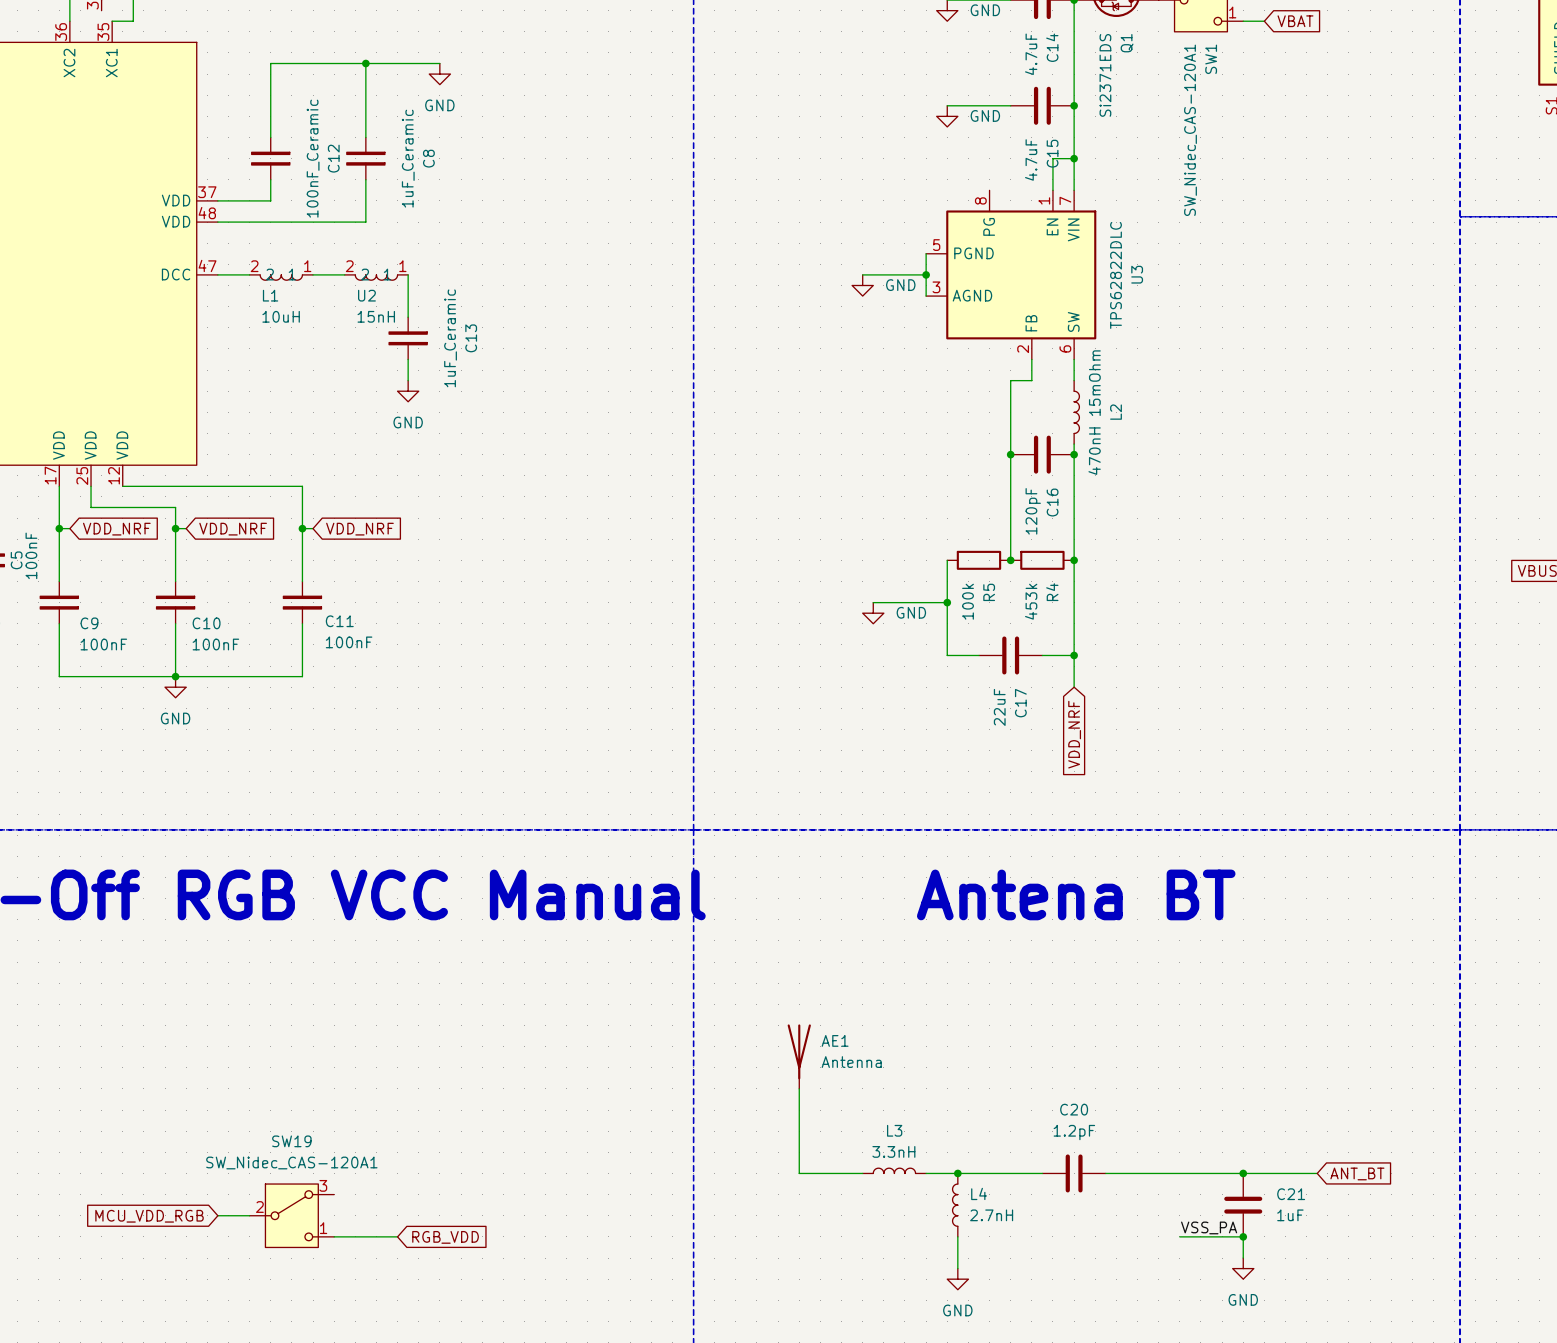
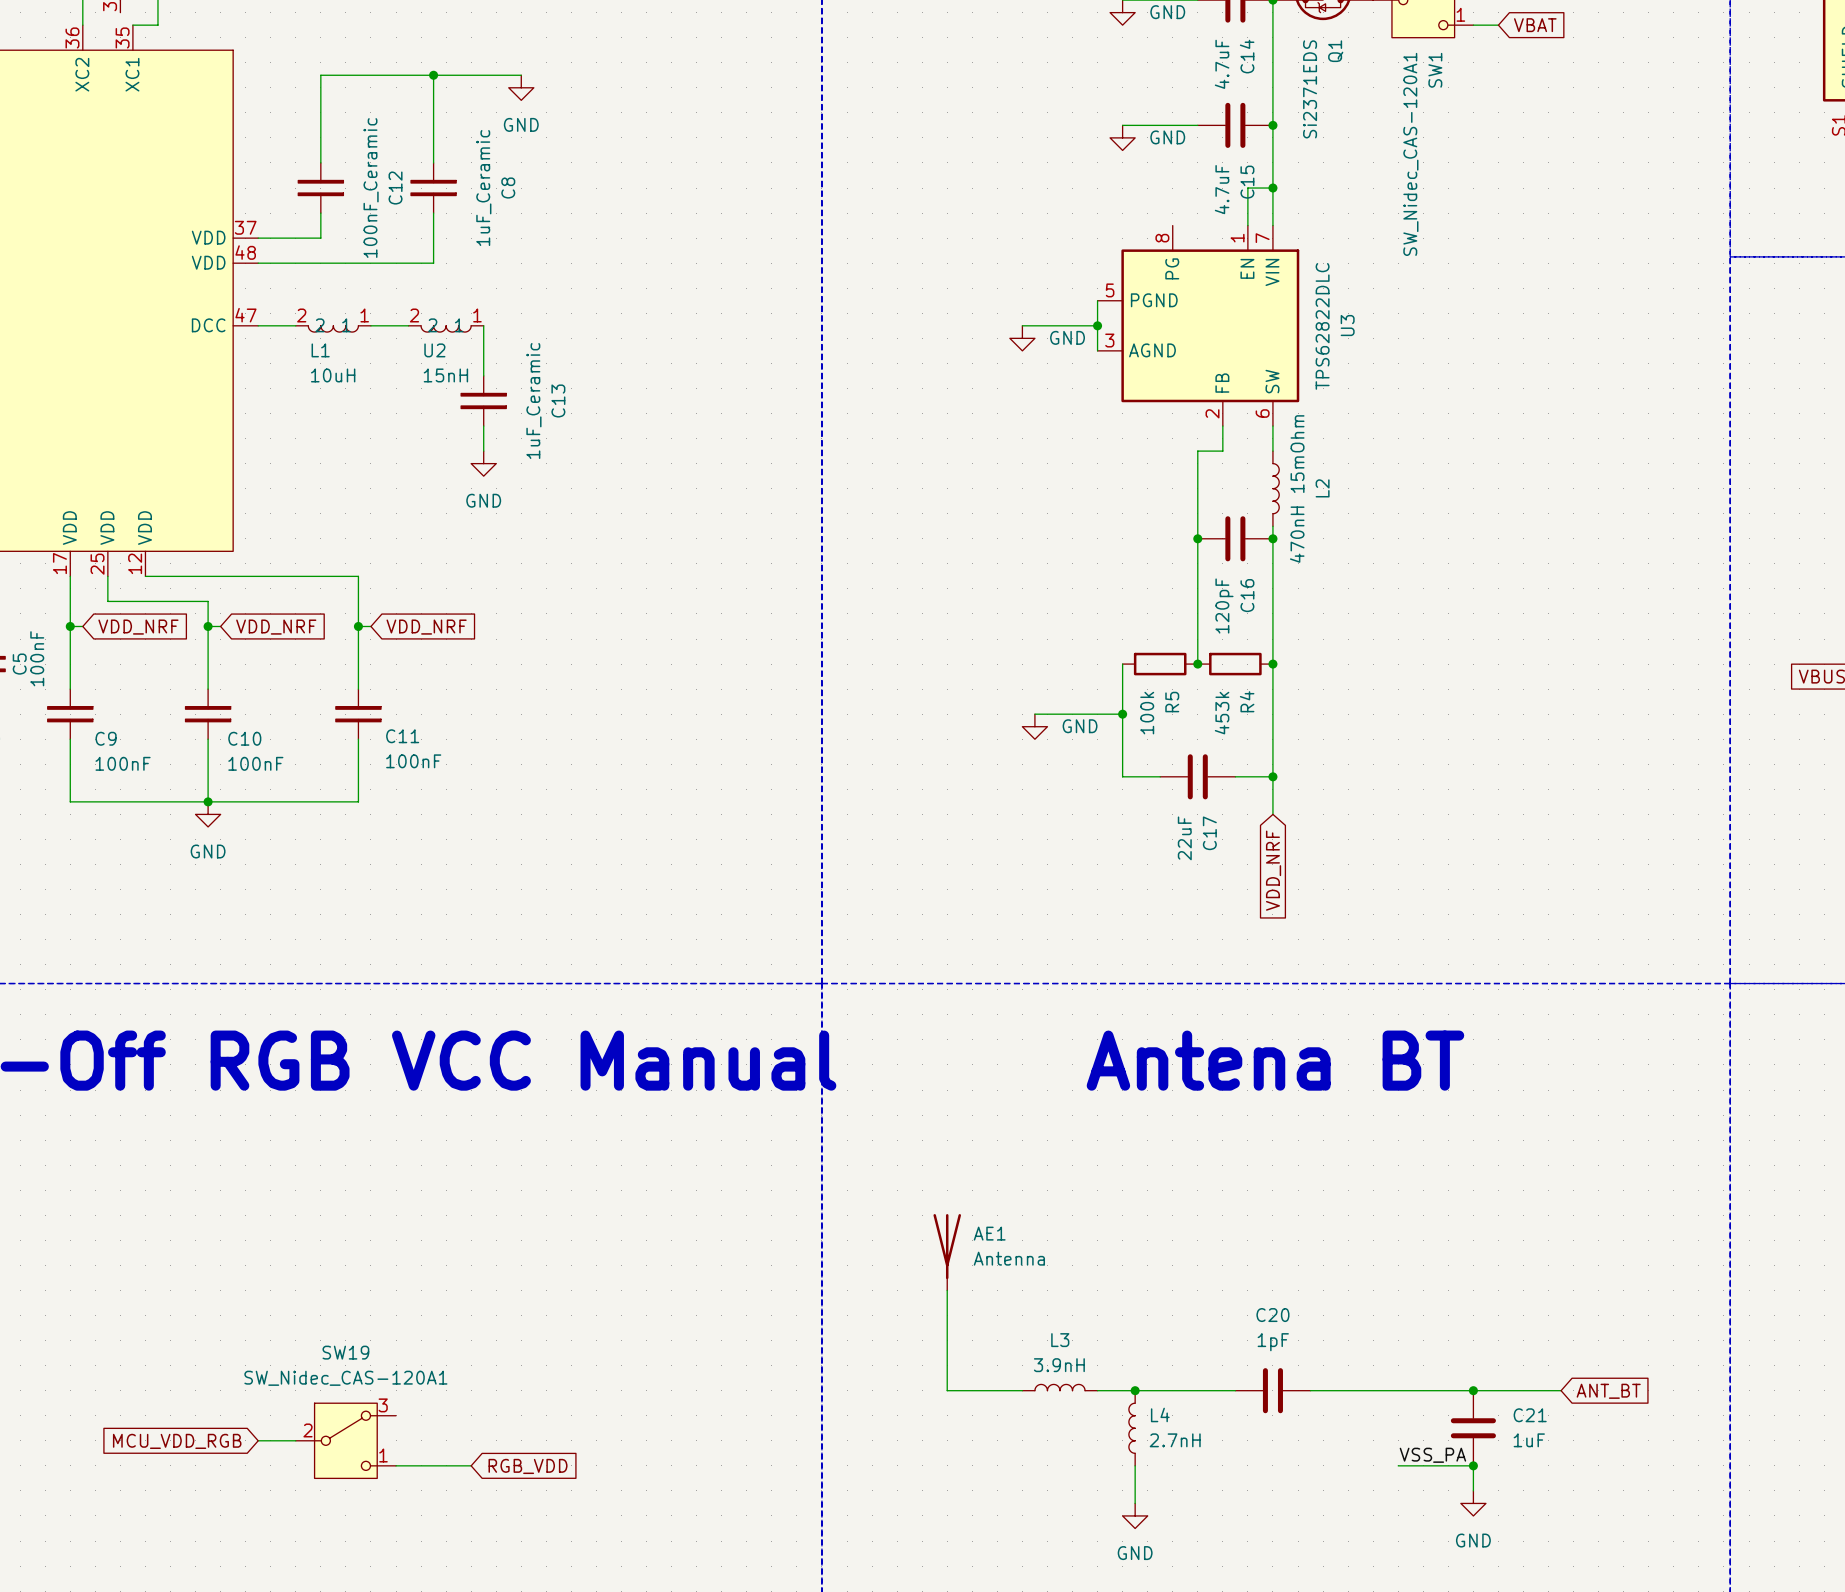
C20 value: 1.2pF (1074, 1132) -> 1pF (1273, 1342)
L3 value: 3.3nH (893, 1151) -> 3.9nH (1059, 1365)

